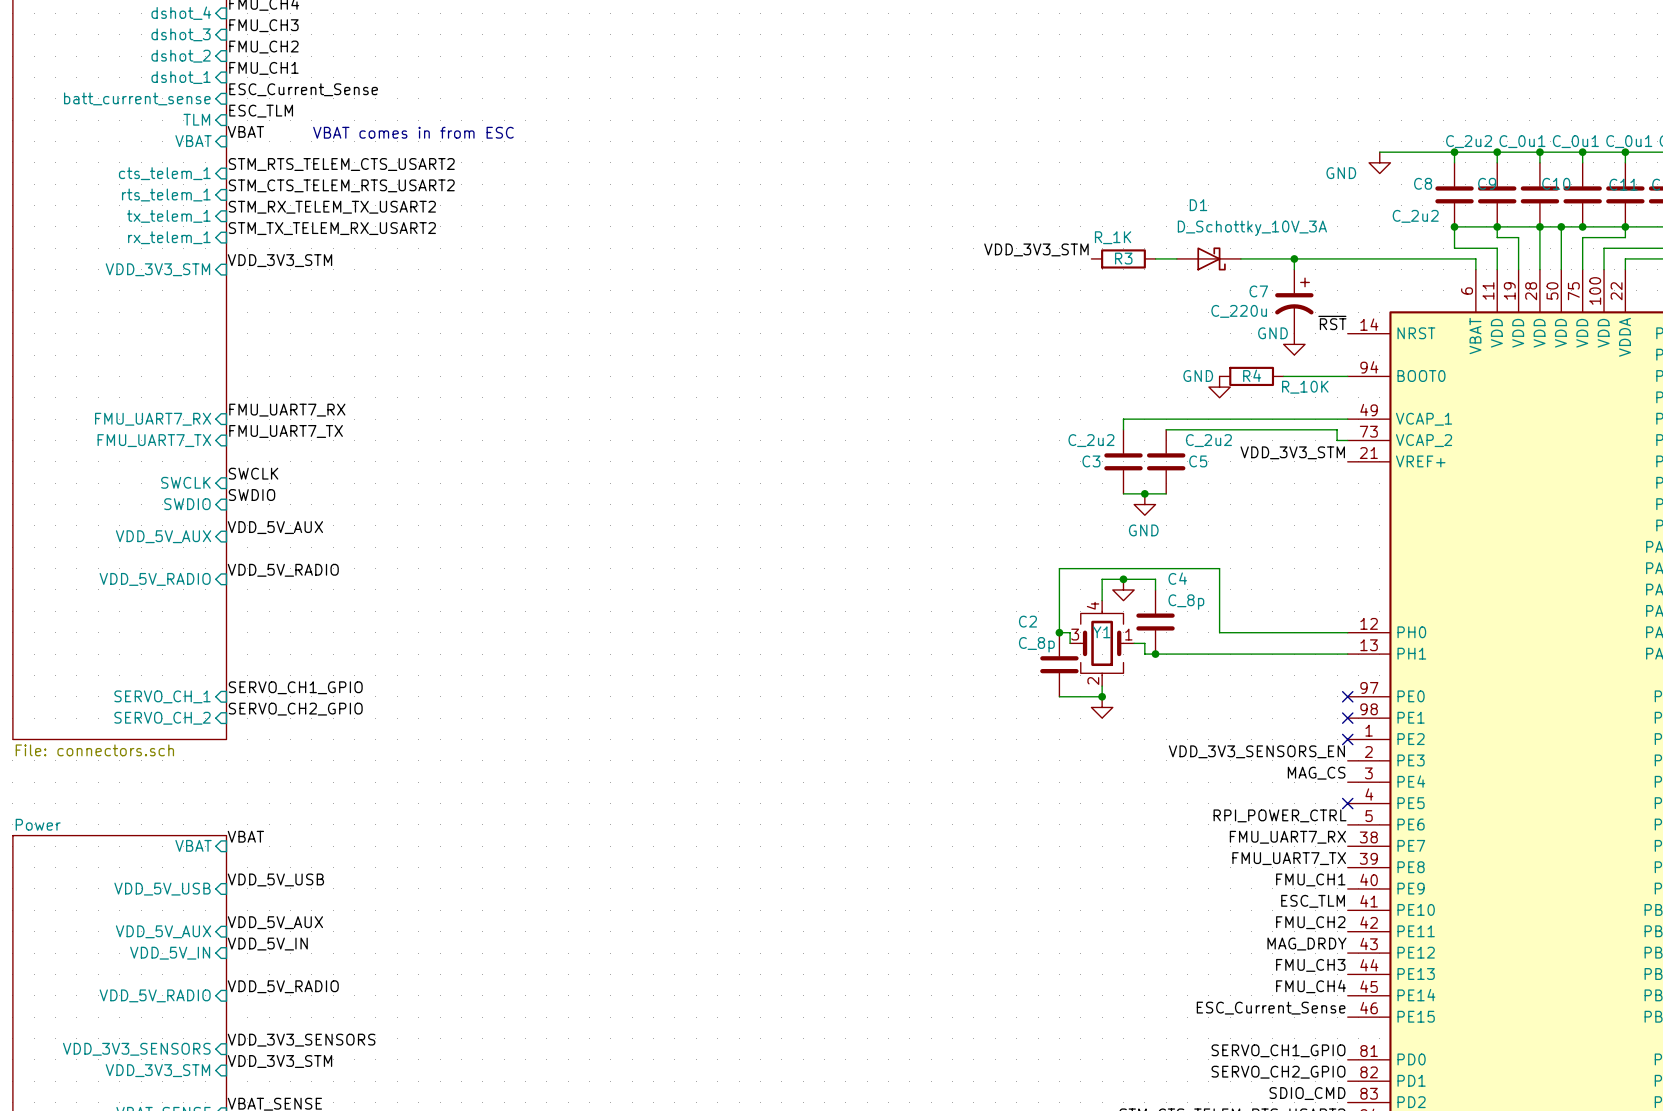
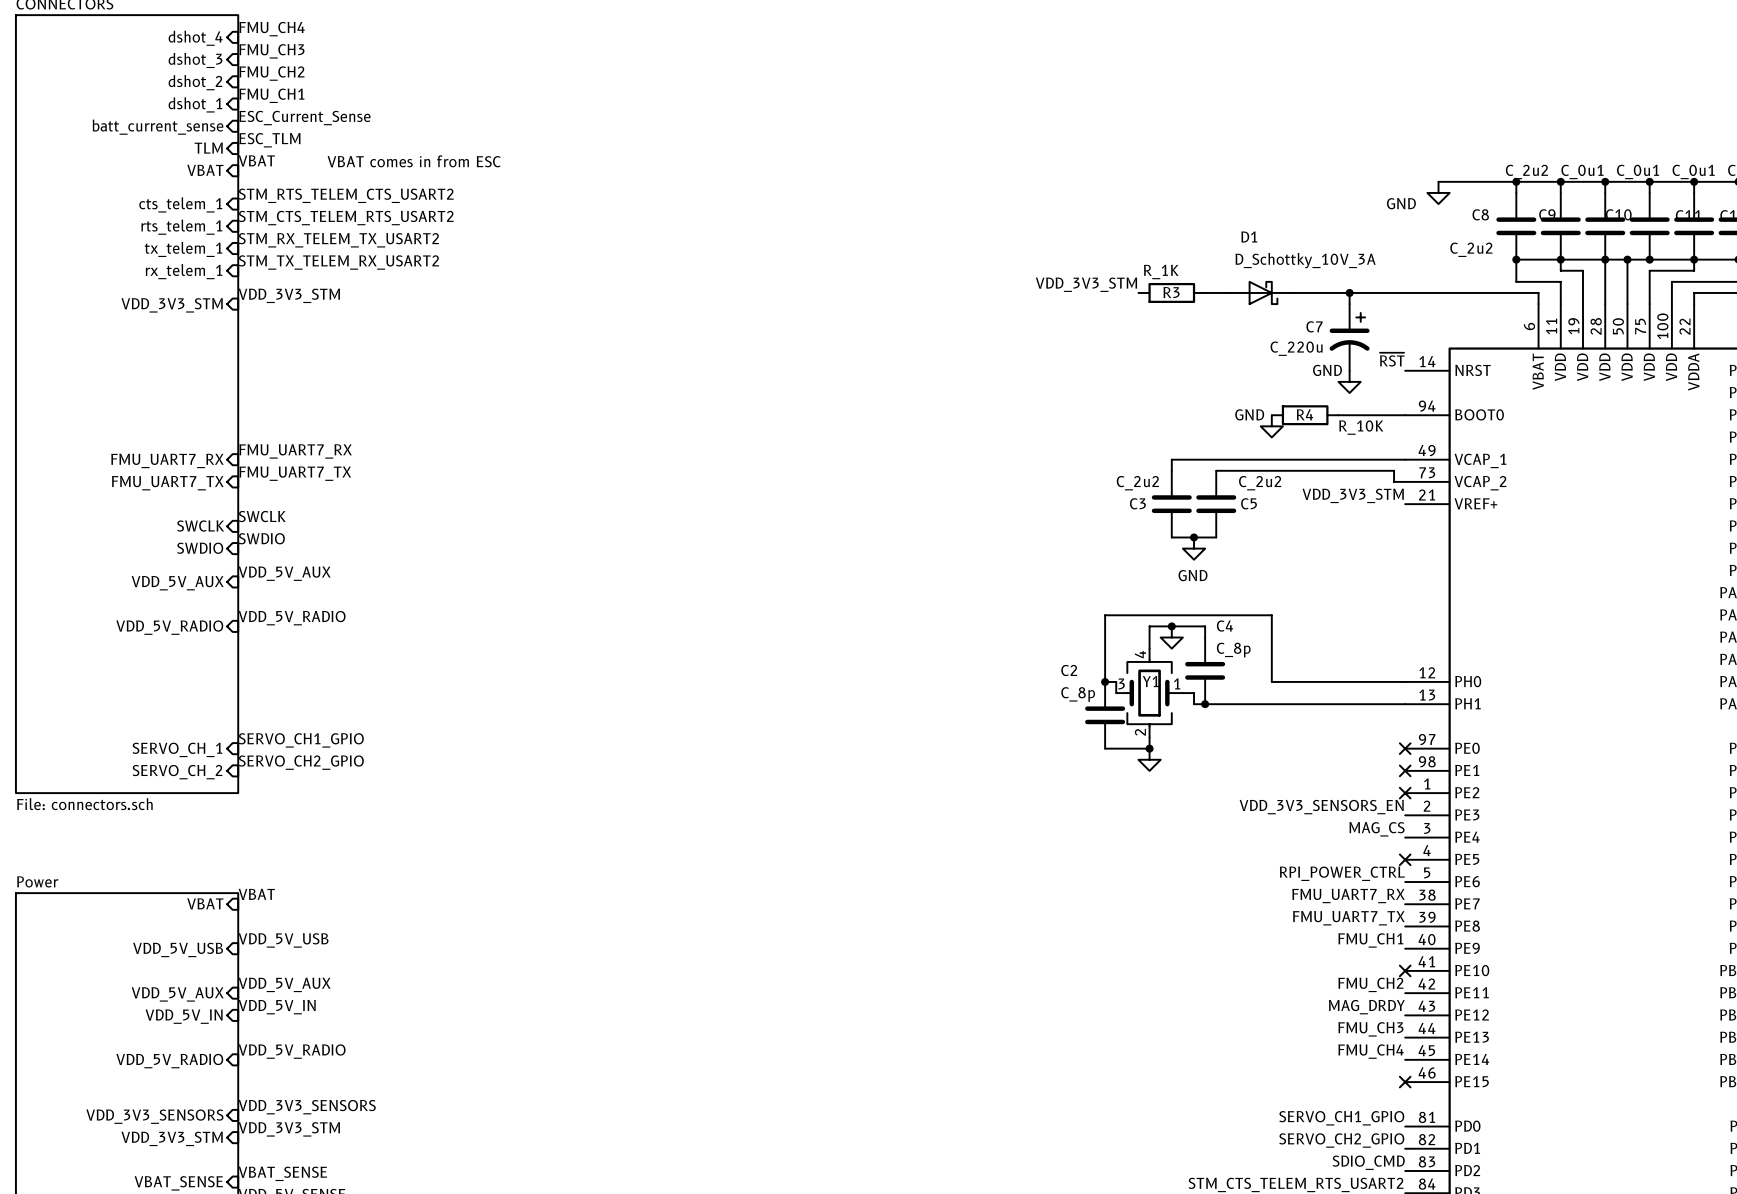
label: ESC_TLM (1313, 901) -> none
no-connect mark: none -> (1405, 970)
label: ESC_Current_Sense (1271, 1008) -> none
no-connect mark: none -> (1405, 1082)

